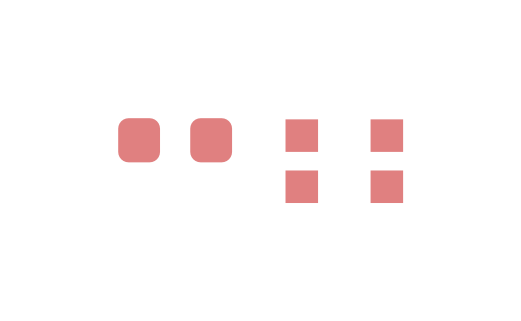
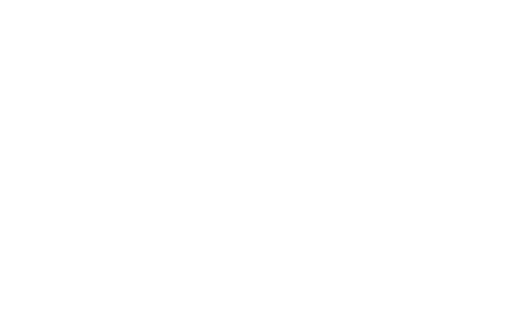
part: (175, 140) -> none
part: (344, 161) -> none

